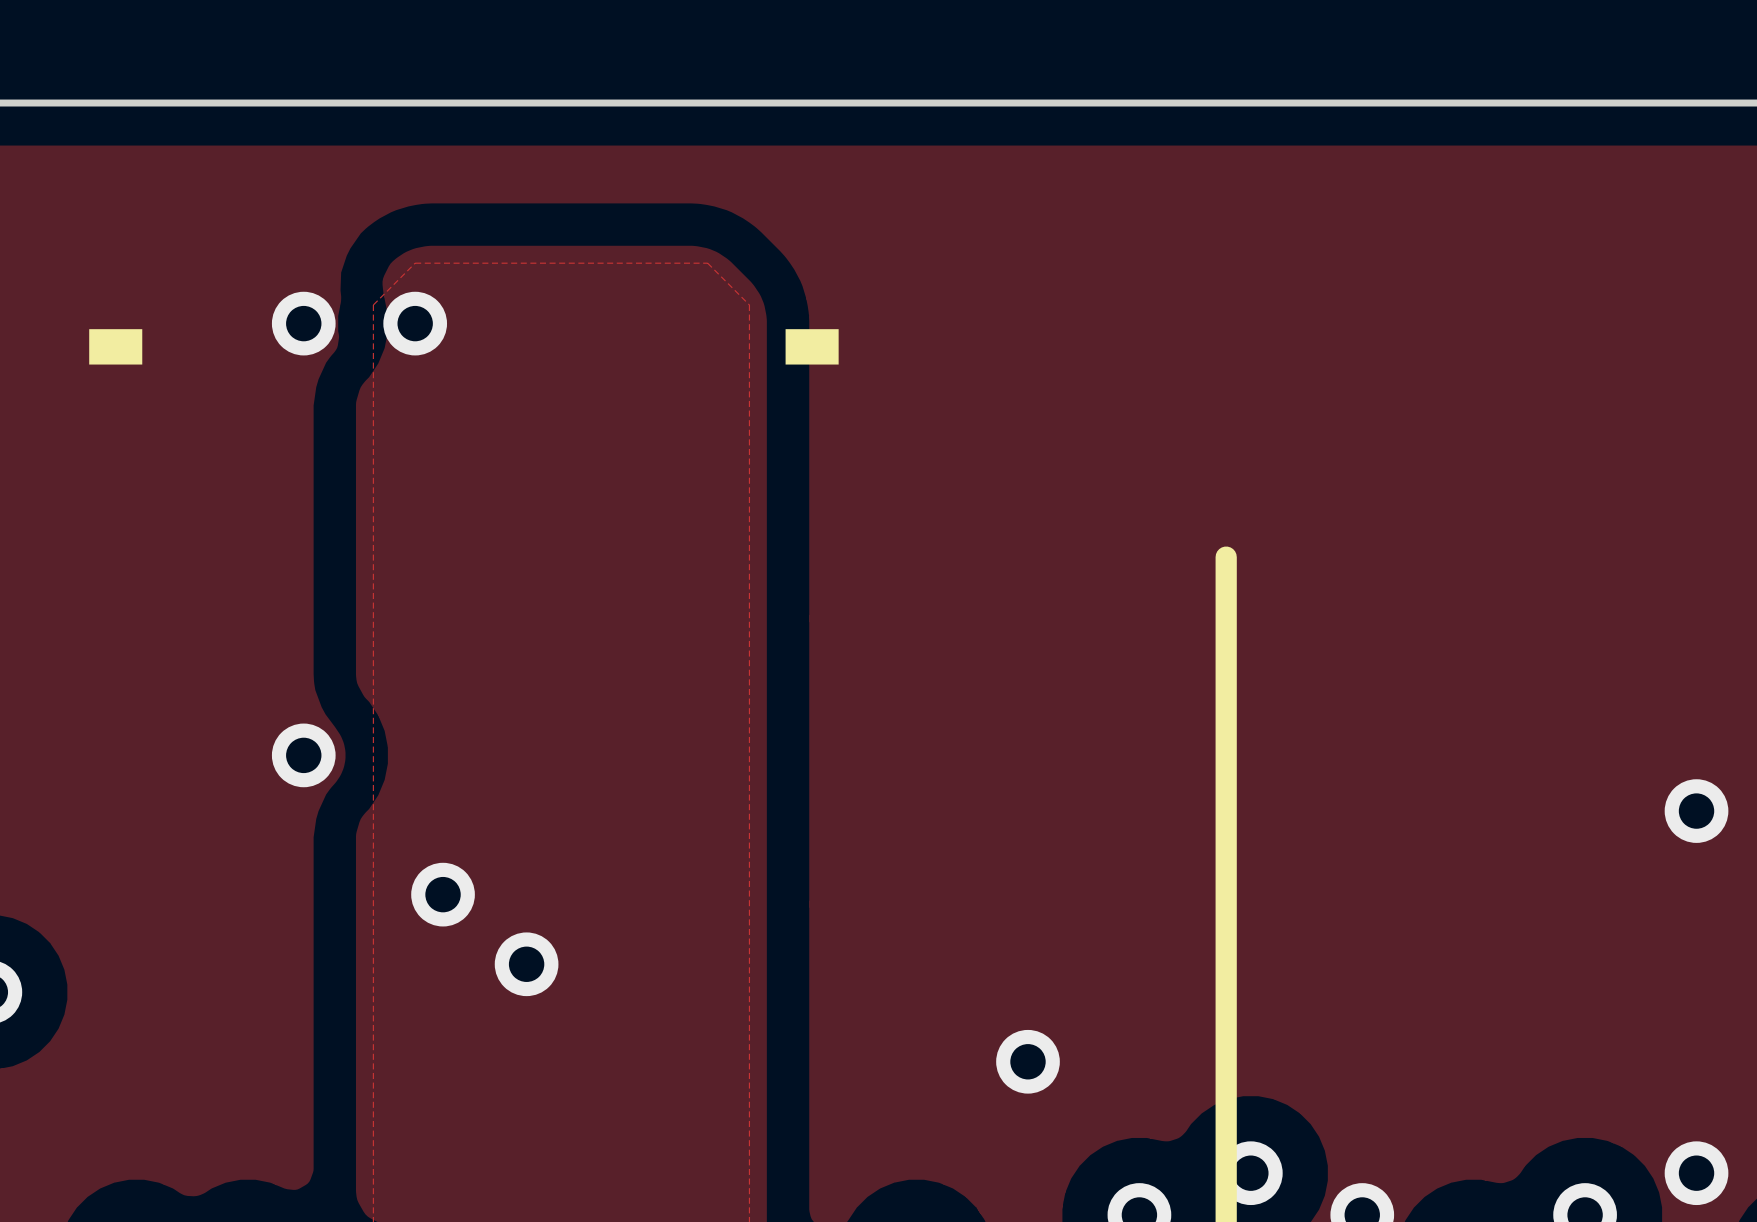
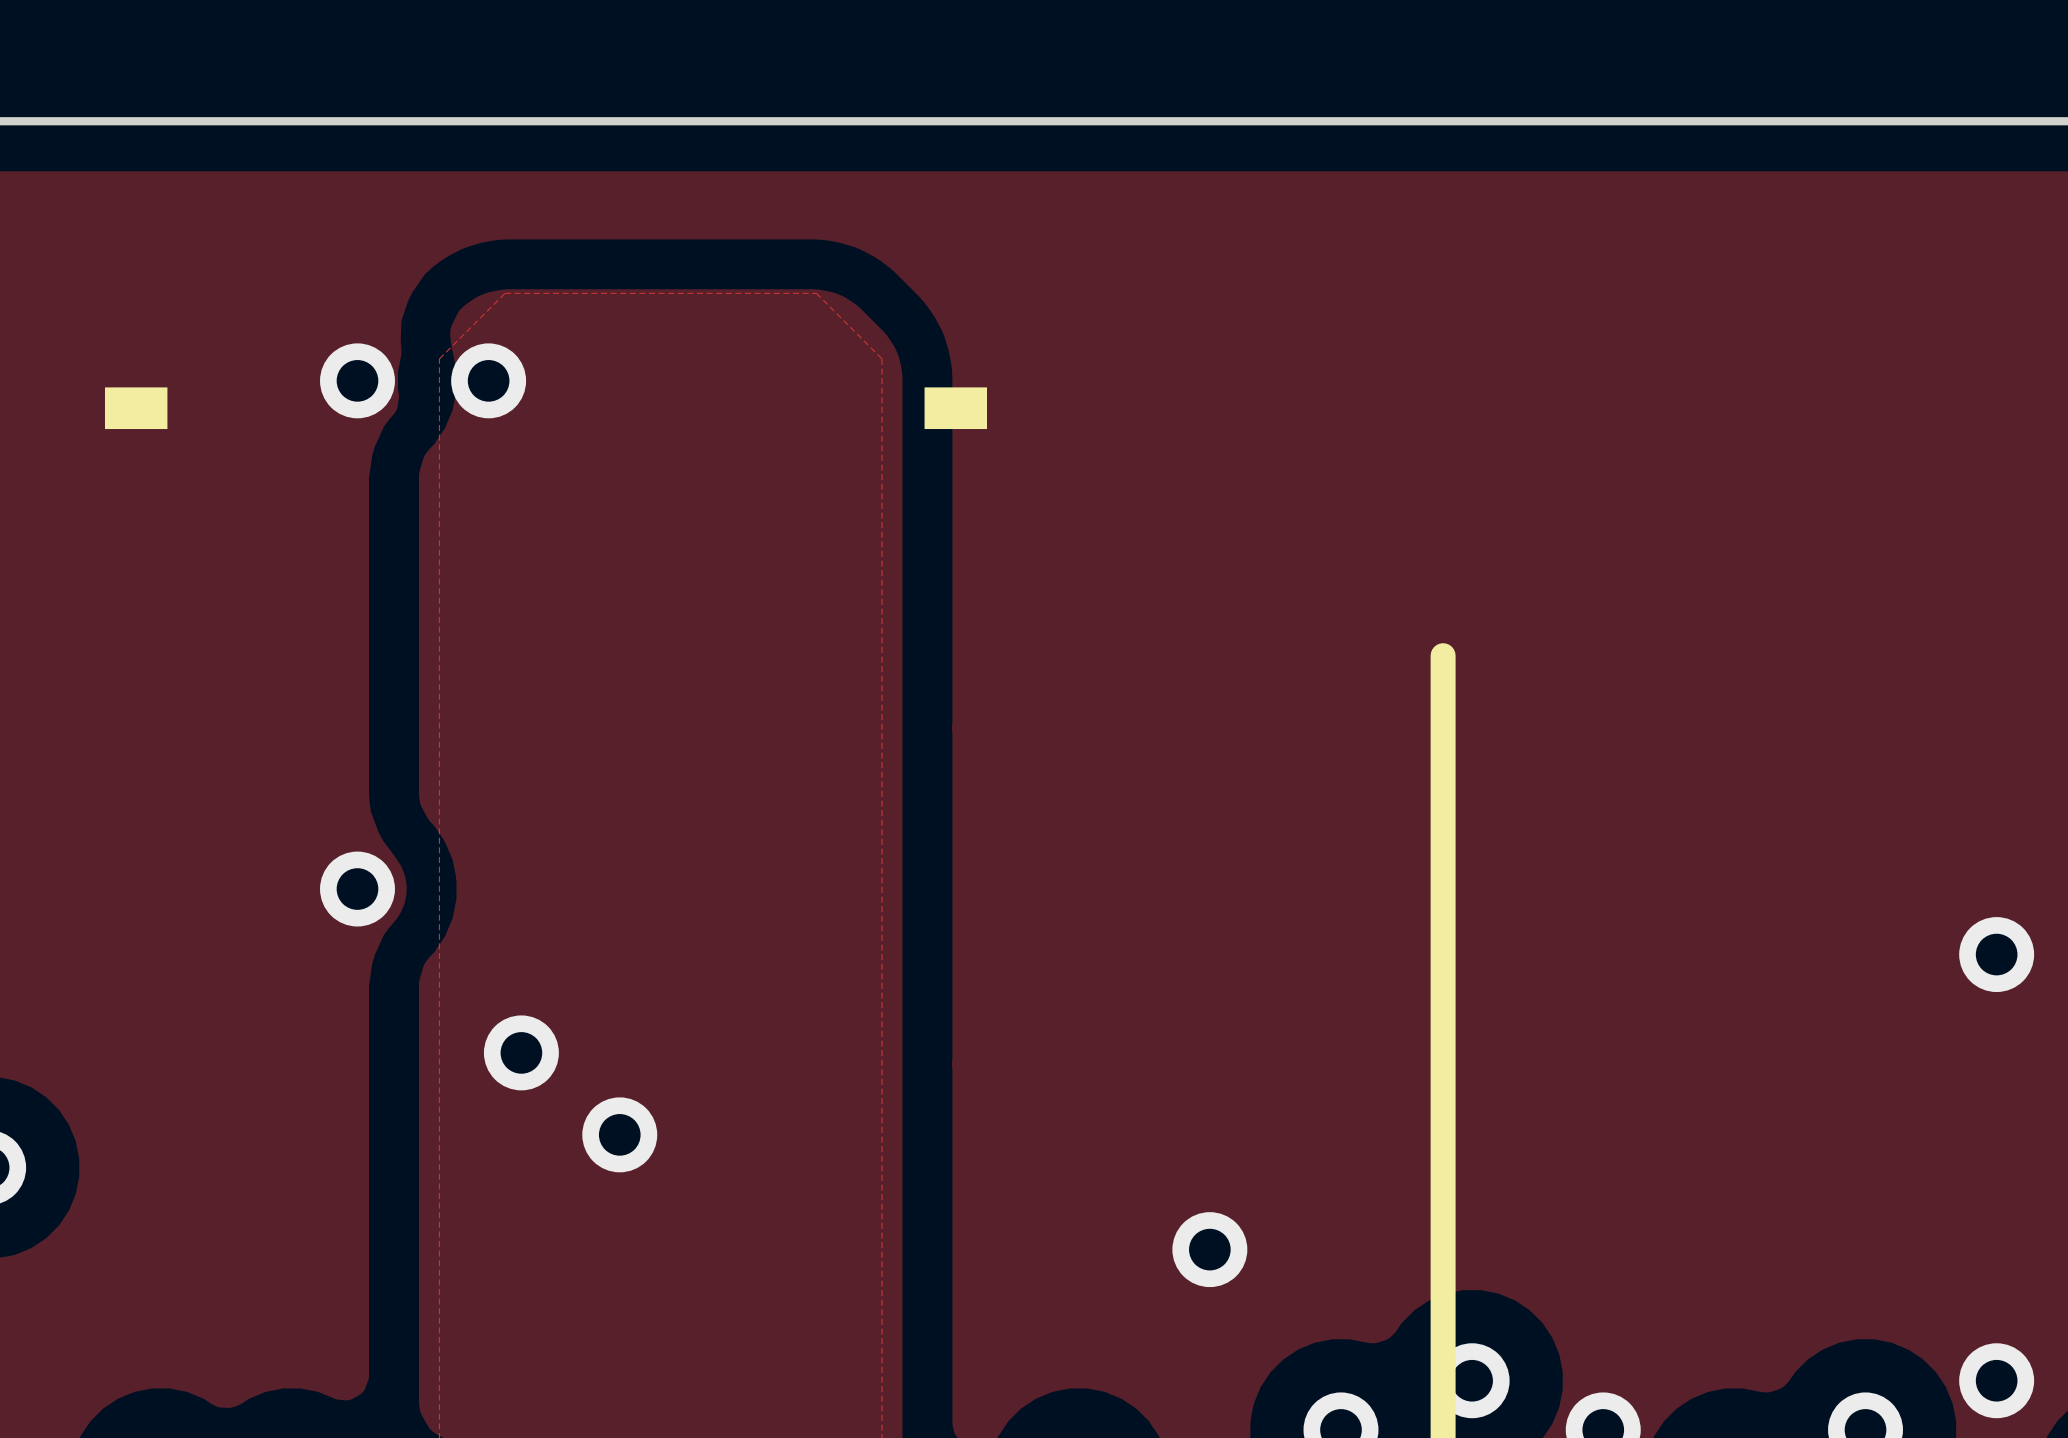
zone outline: (415, 263) (707, 263) -> (488, 309) (505, 293) (816, 293) (832, 309)

